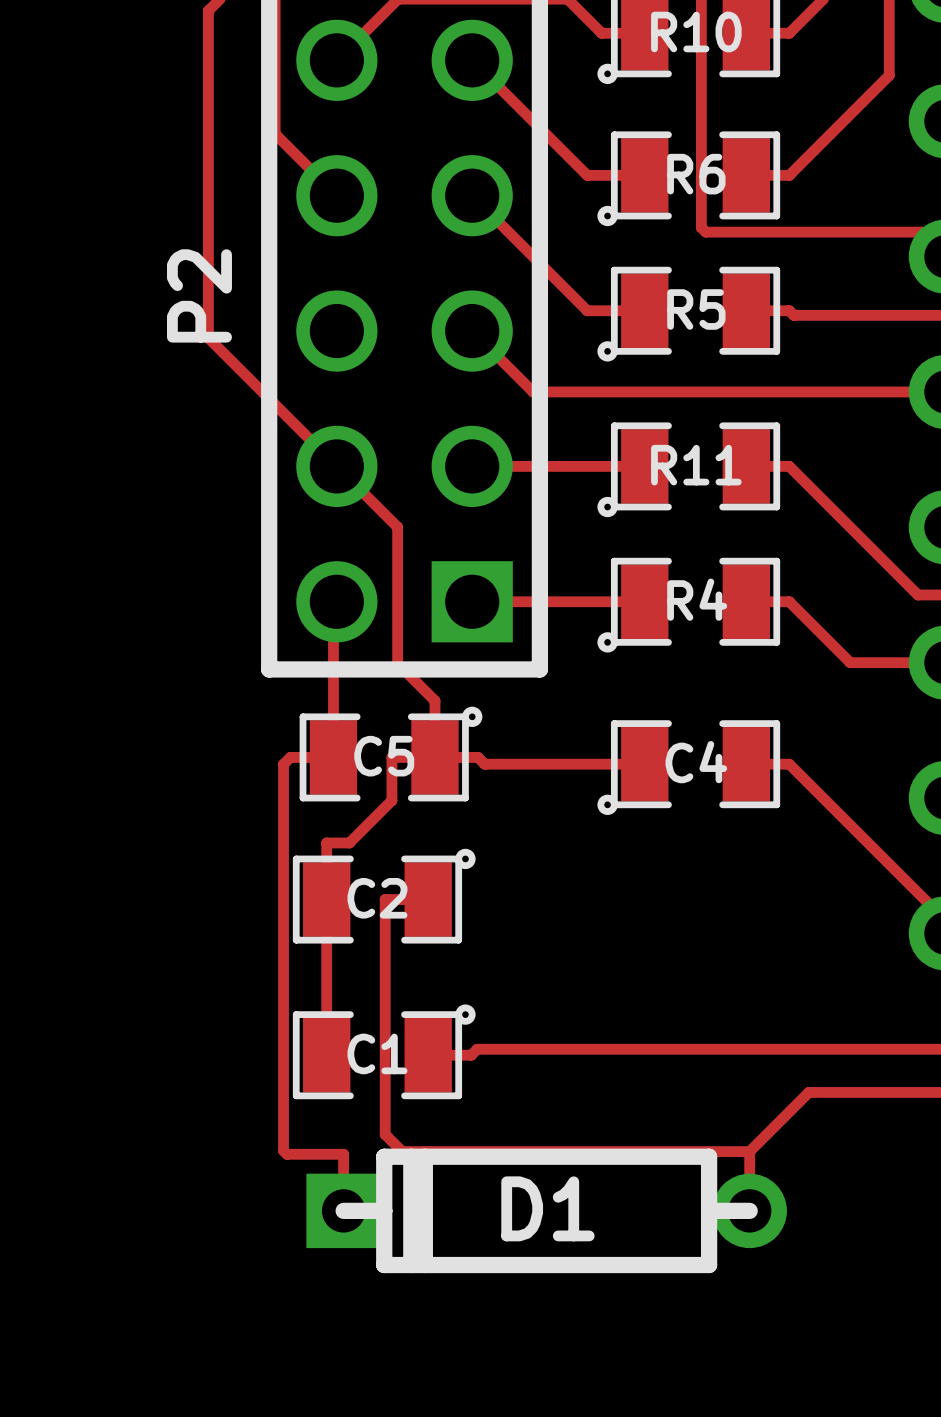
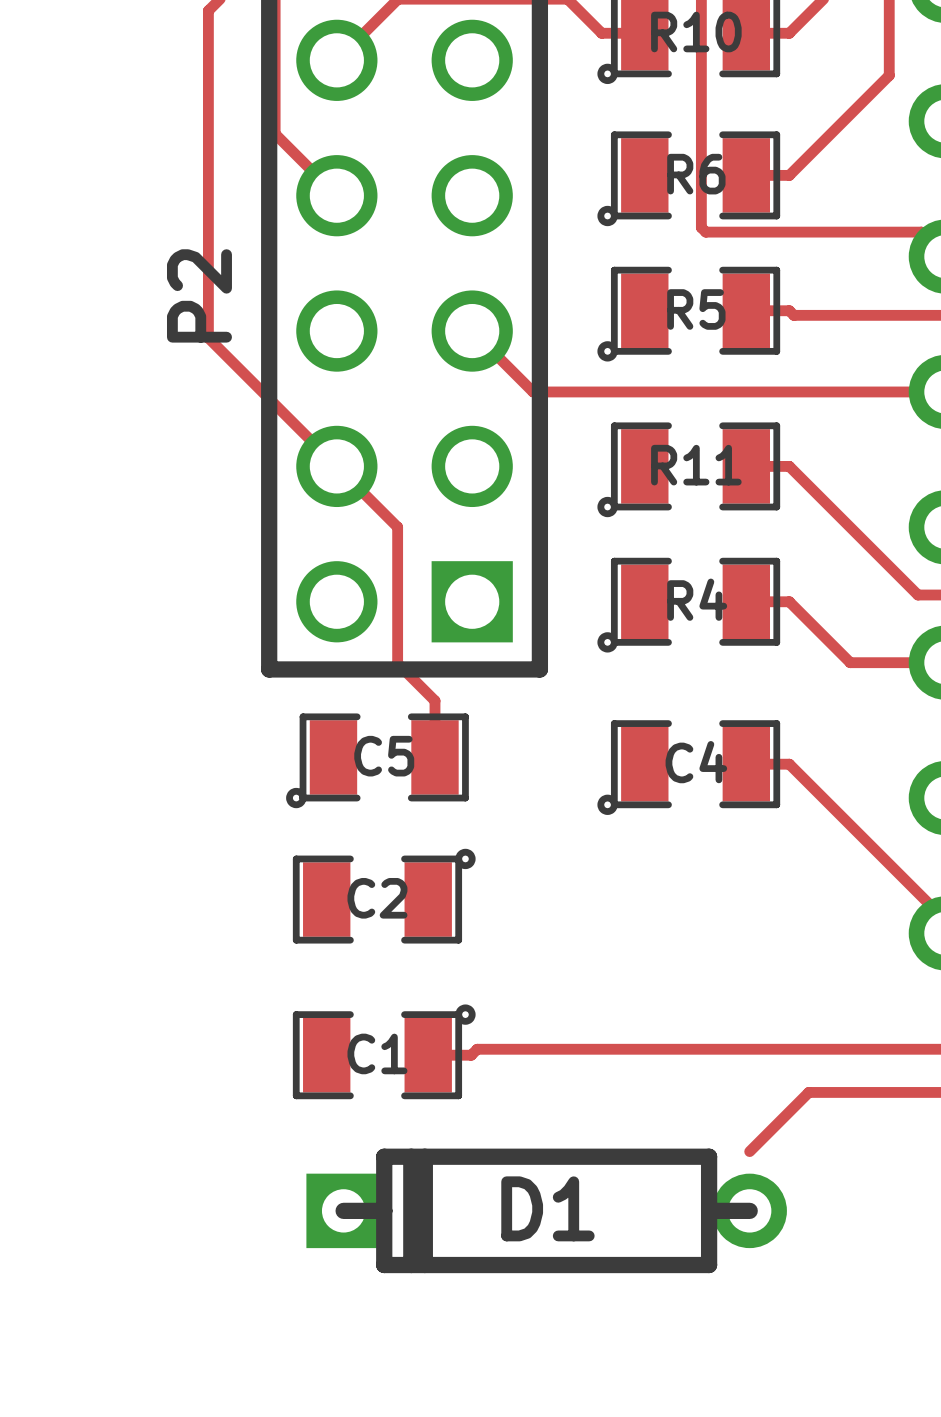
track: (472, 60) (587, 175) (644, 175) -> none
track: (472, 195) (587, 310) (644, 310) -> none
track: (472, 466) (644, 466) -> none
track: (336, 601) (333, 605) (333, 757) (290, 757) (283, 764) (283, 1150) (287, 1154) (343, 1154) (343, 1210) -> none
track: (472, 601) (644, 601) -> none
C5 rotation: 0° (391, 754) -> 180° (377, 760)
track: (644, 764) (484, 764) (478, 757) (391, 757) (391, 800) (349, 842) (326, 842) (326, 1055) -> none
track: (428, 899) (385, 899) (385, 1134) (402, 1151) (749, 1151) (749, 1210) -> none

